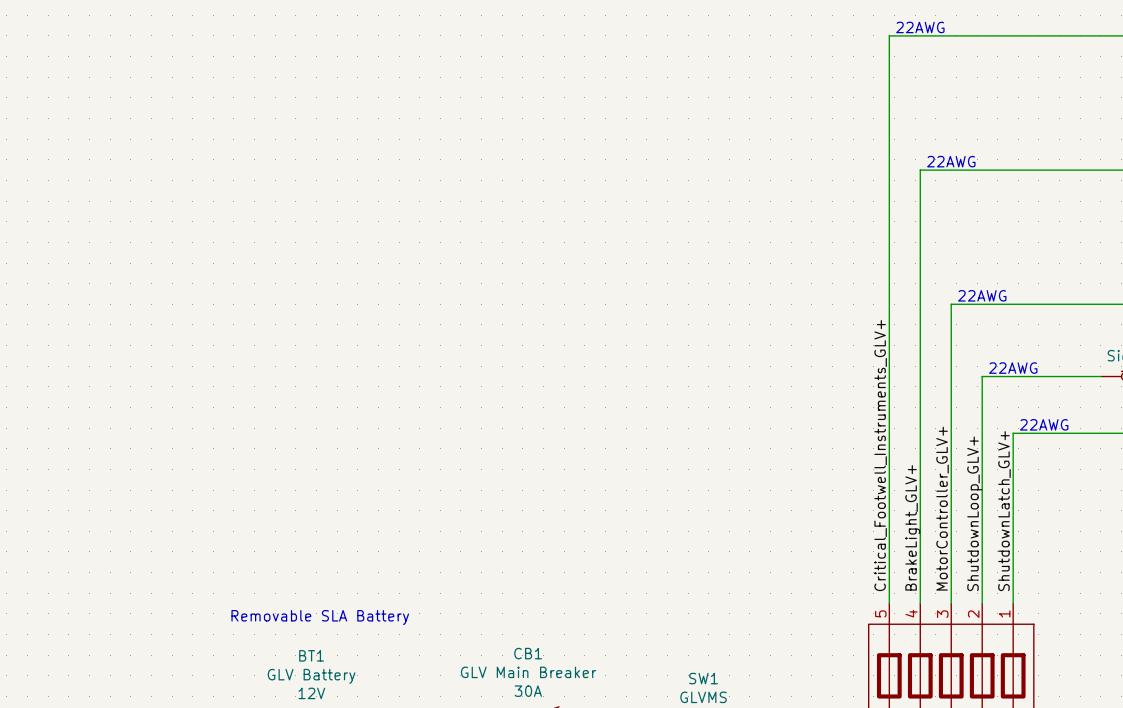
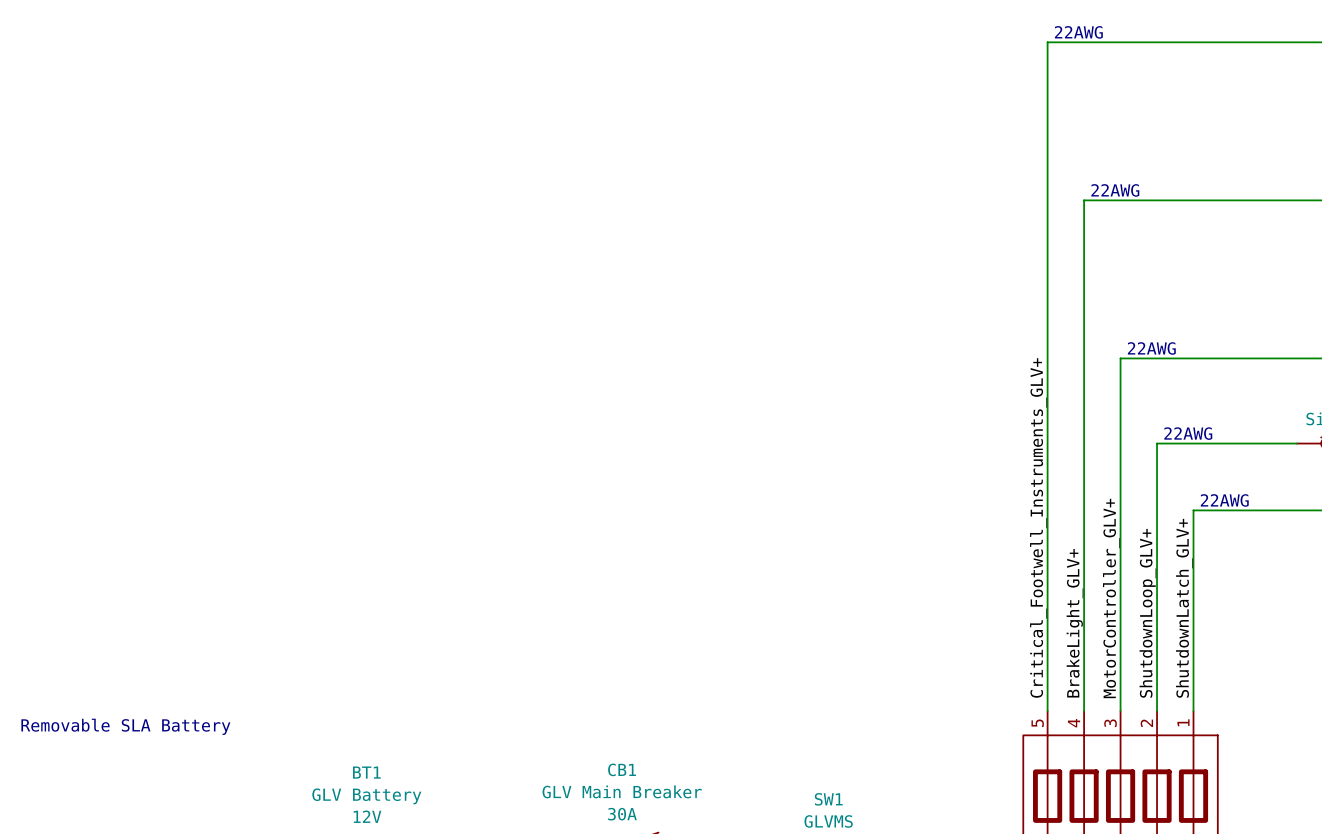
text: none -> Removable SLA Battery (125, 726)
text: Removable SLA Battery (320, 617) -> none

